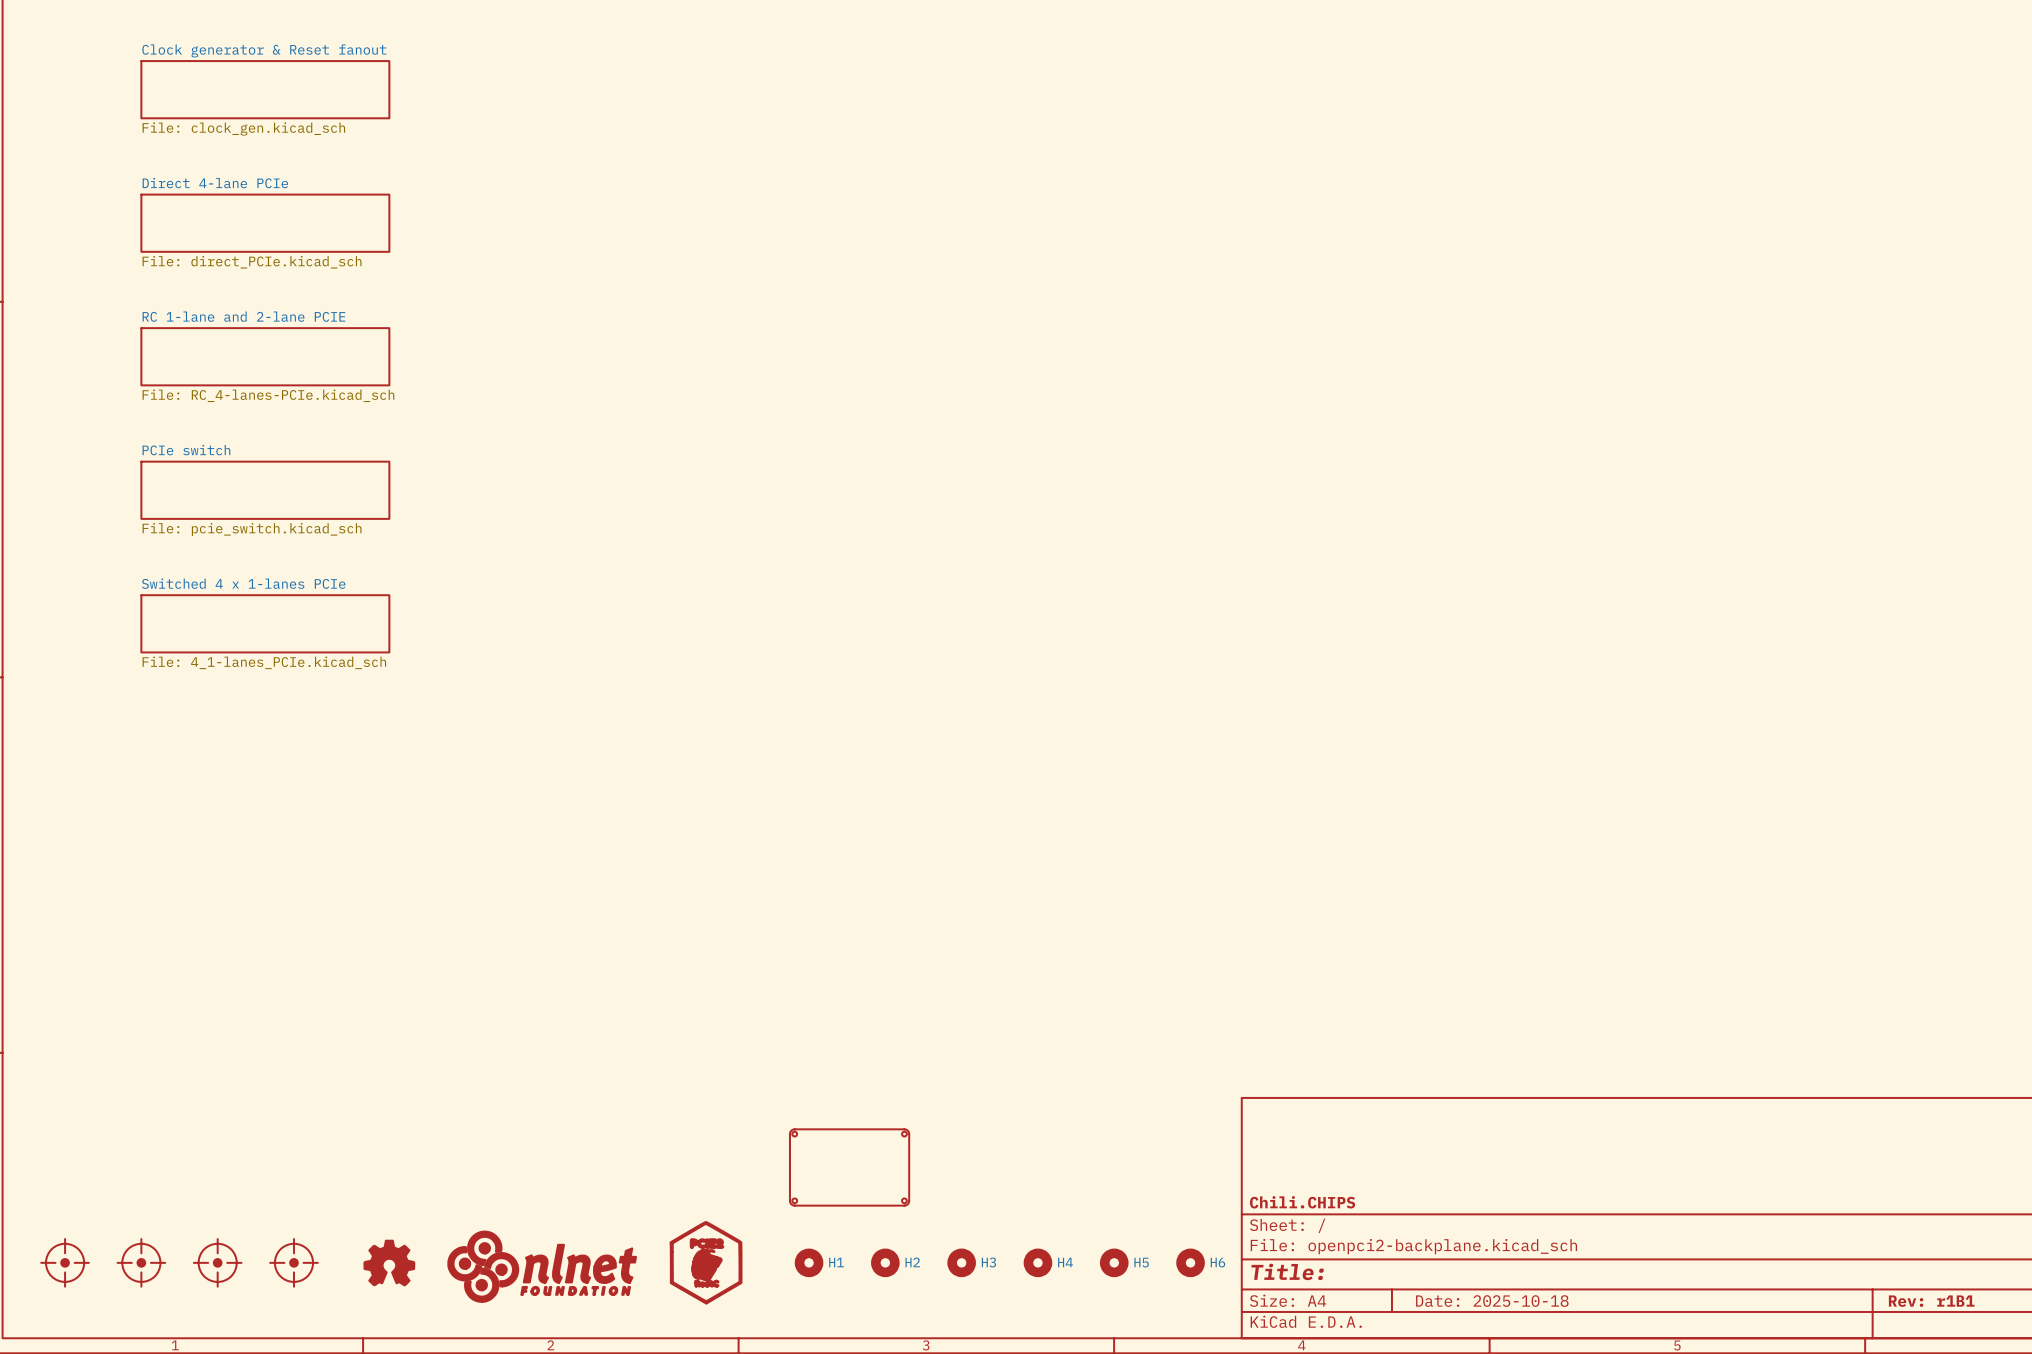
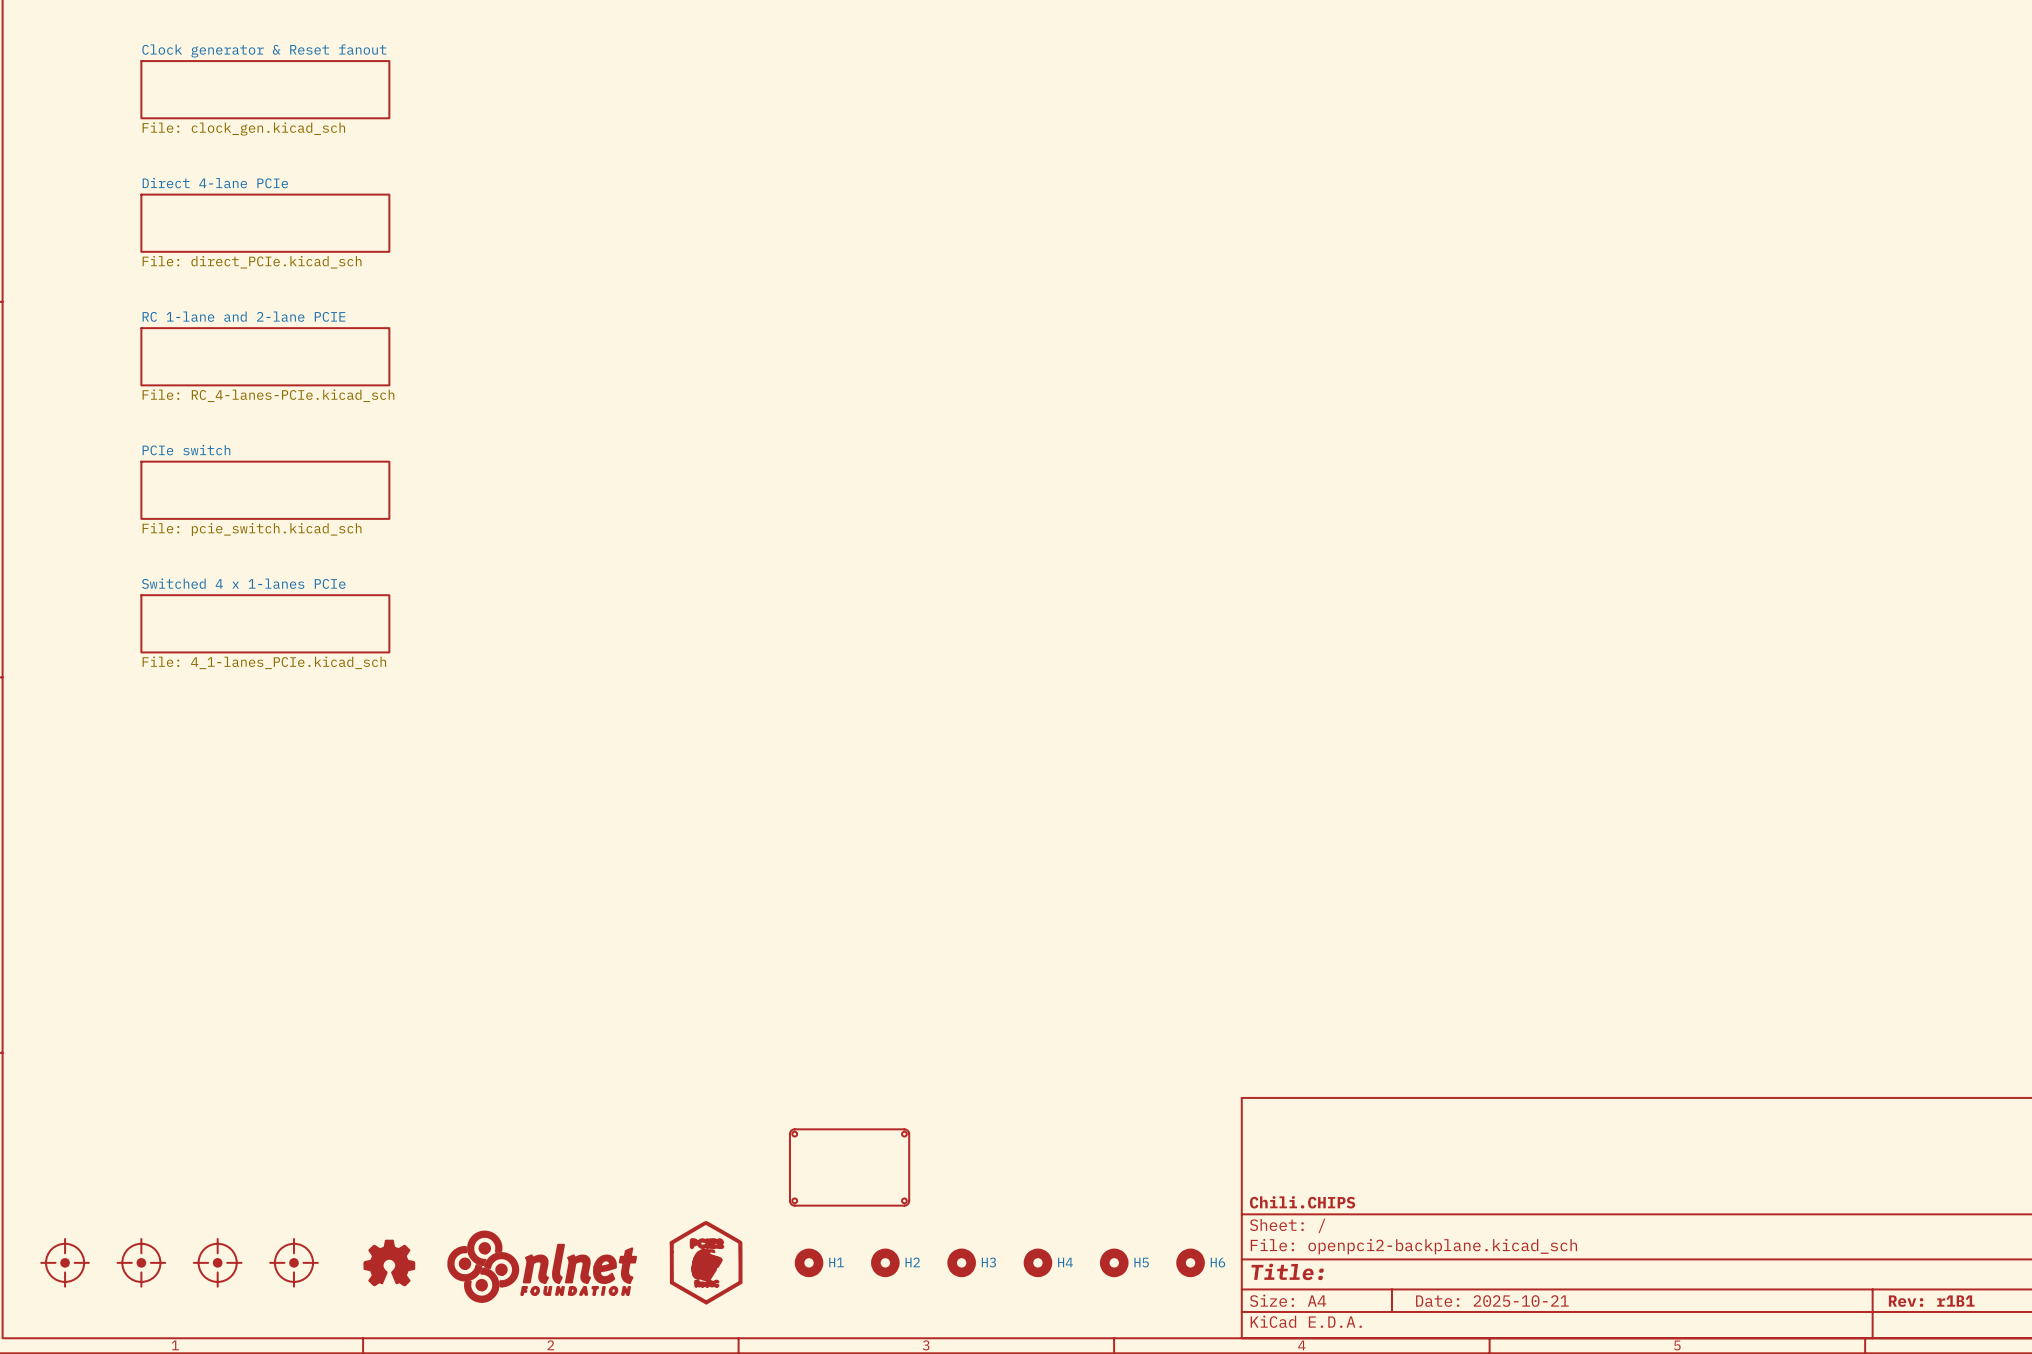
title block: Date: 2025-10-18 (1492, 1301) -> Date: 2025-10-21 (1492, 1301)

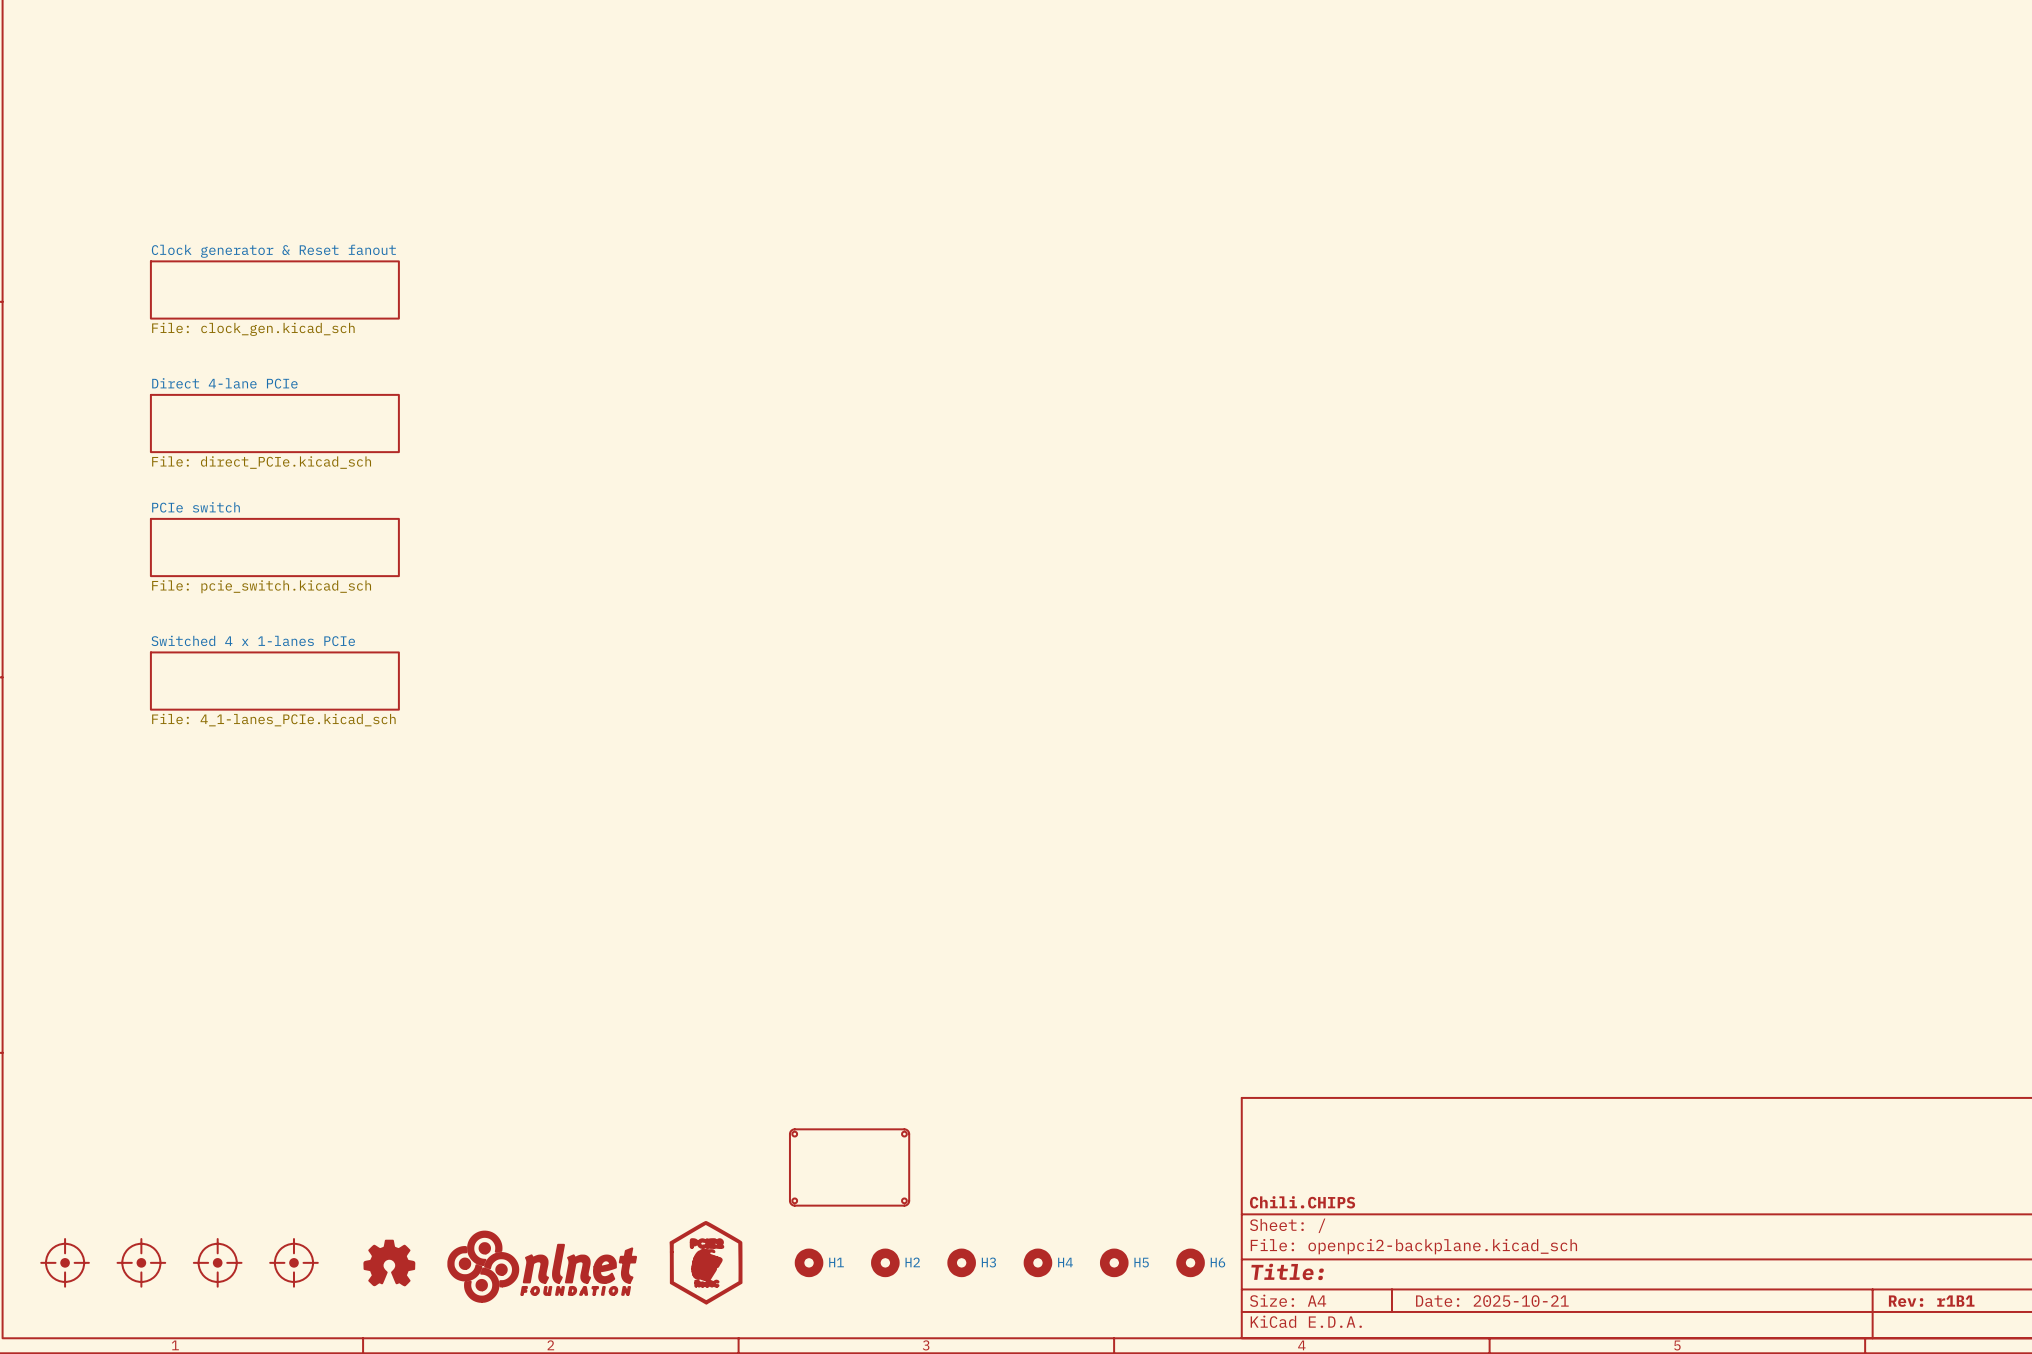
sheet Clock generator & Reset fanout: File: clock_gen.kicad_sch (265, 89) -> none
sheet Direct 4-lane PCIe position: (265, 223) -> (274, 423)
sheet Clock generator & Reset fanout: none -> File: clock_gen.kicad_sch (274, 289)
sheet RC 1-lane and 2-lane PCIE: File: RC_4-lanes-PCIe.kicad_sch (265, 356) -> none
sheet PCIe switch position: (265, 490) -> (274, 547)
sheet Switched 4 x 1-lanes PCIe position: (265, 623) -> (274, 681)

